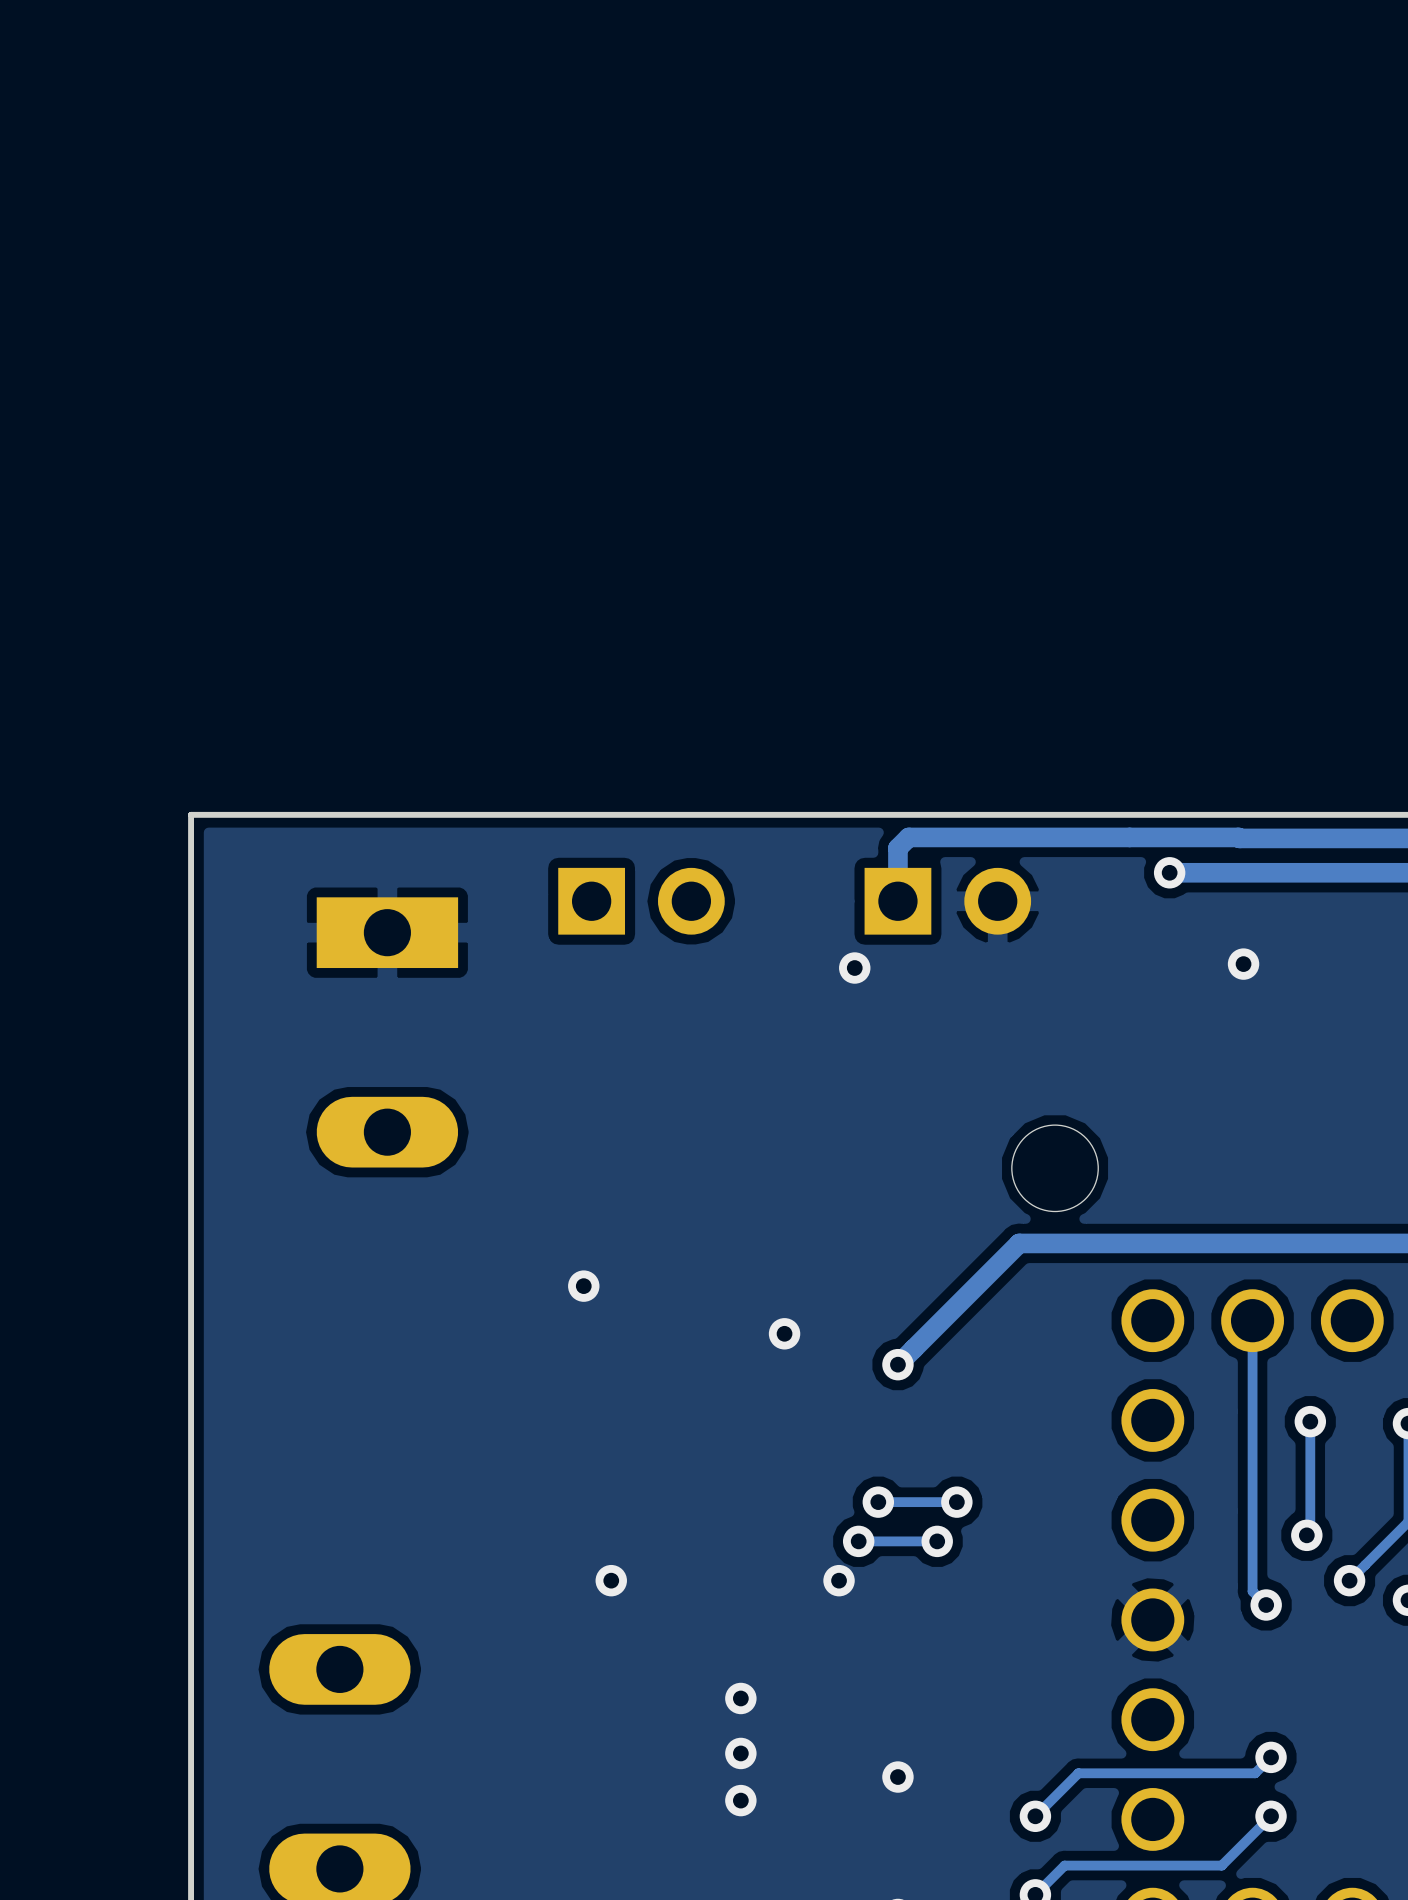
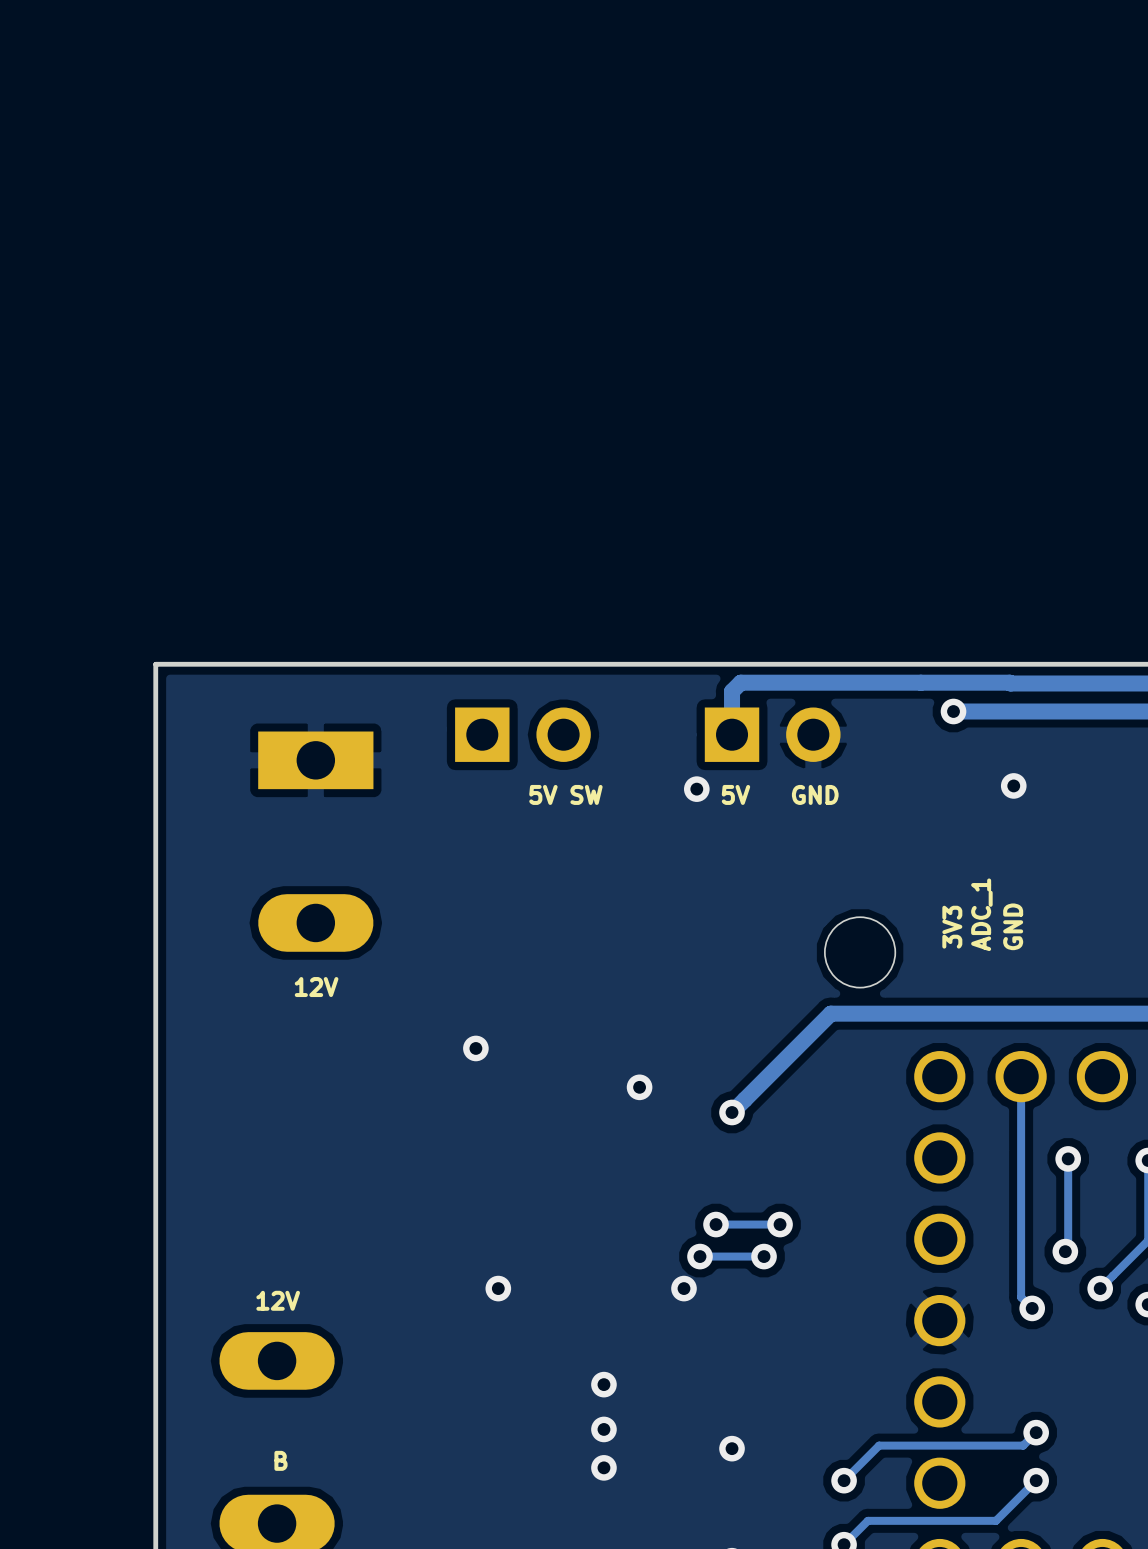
text: none -> 5V SW (565, 794)
text: none -> 5V (735, 794)
text: none -> GND (815, 794)
text: none -> ADC_1 (981, 914)
text: none -> GND (1013, 926)
text: none -> 3V3 (952, 927)
text: none -> 12V (316, 987)
text: none -> 12V (278, 1300)
text: none -> B (280, 1460)

